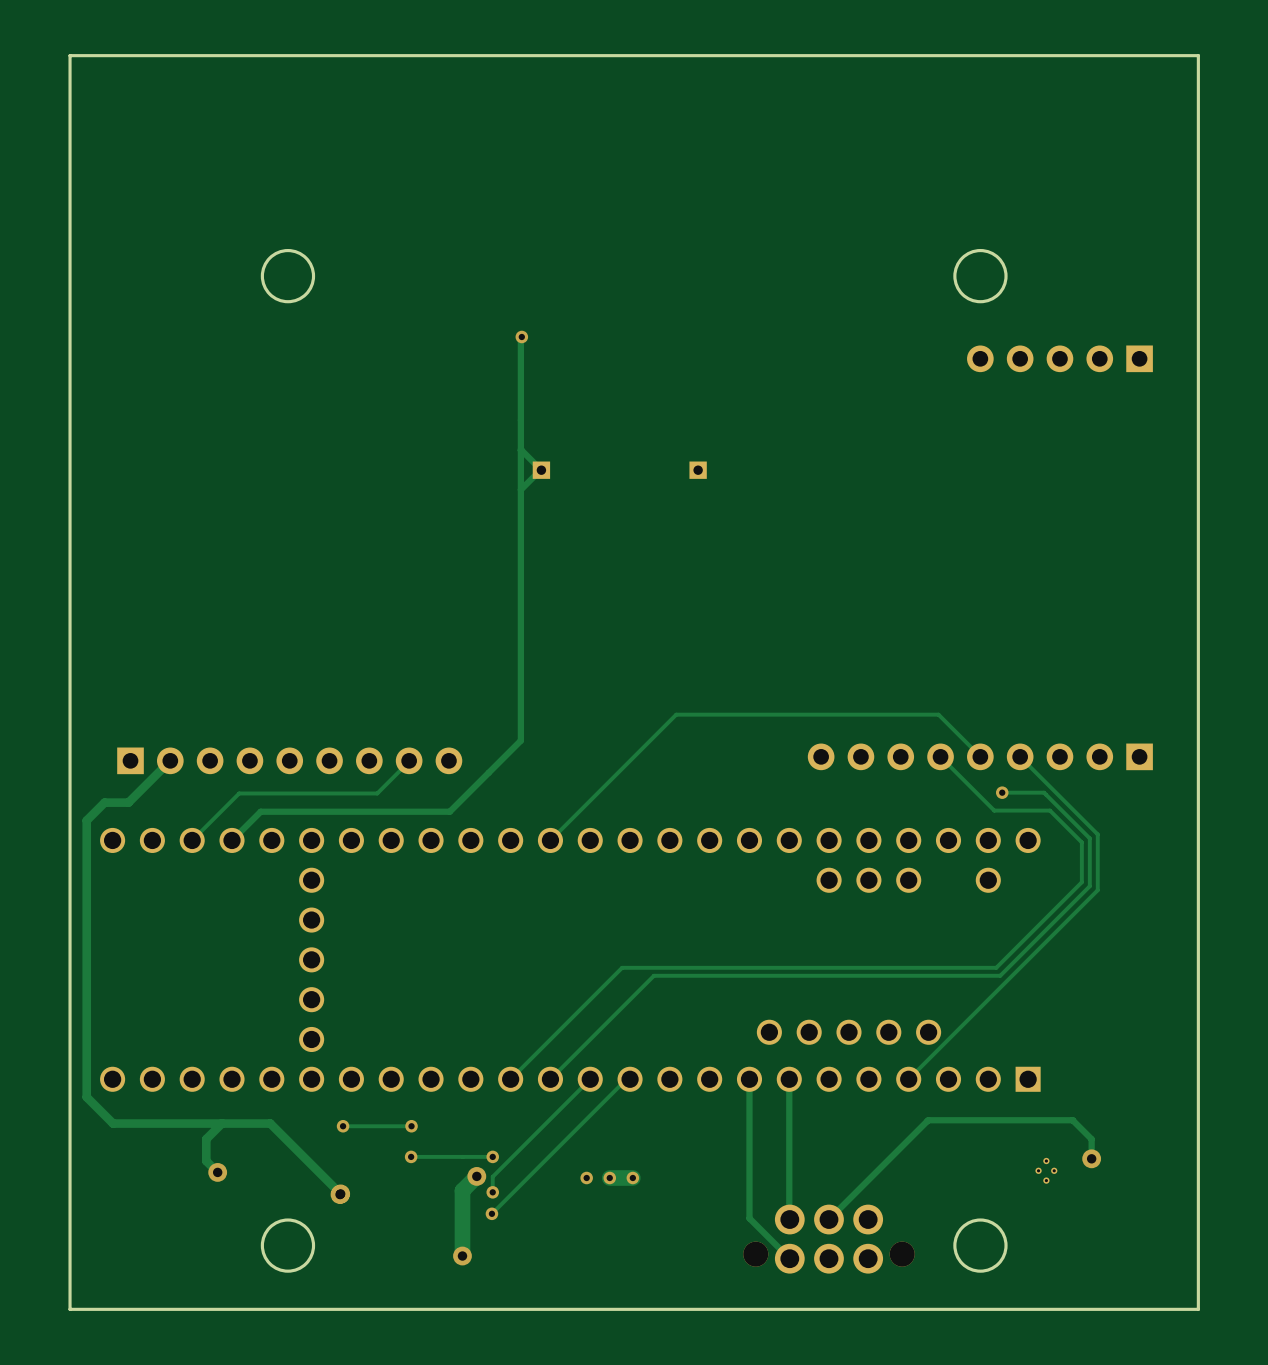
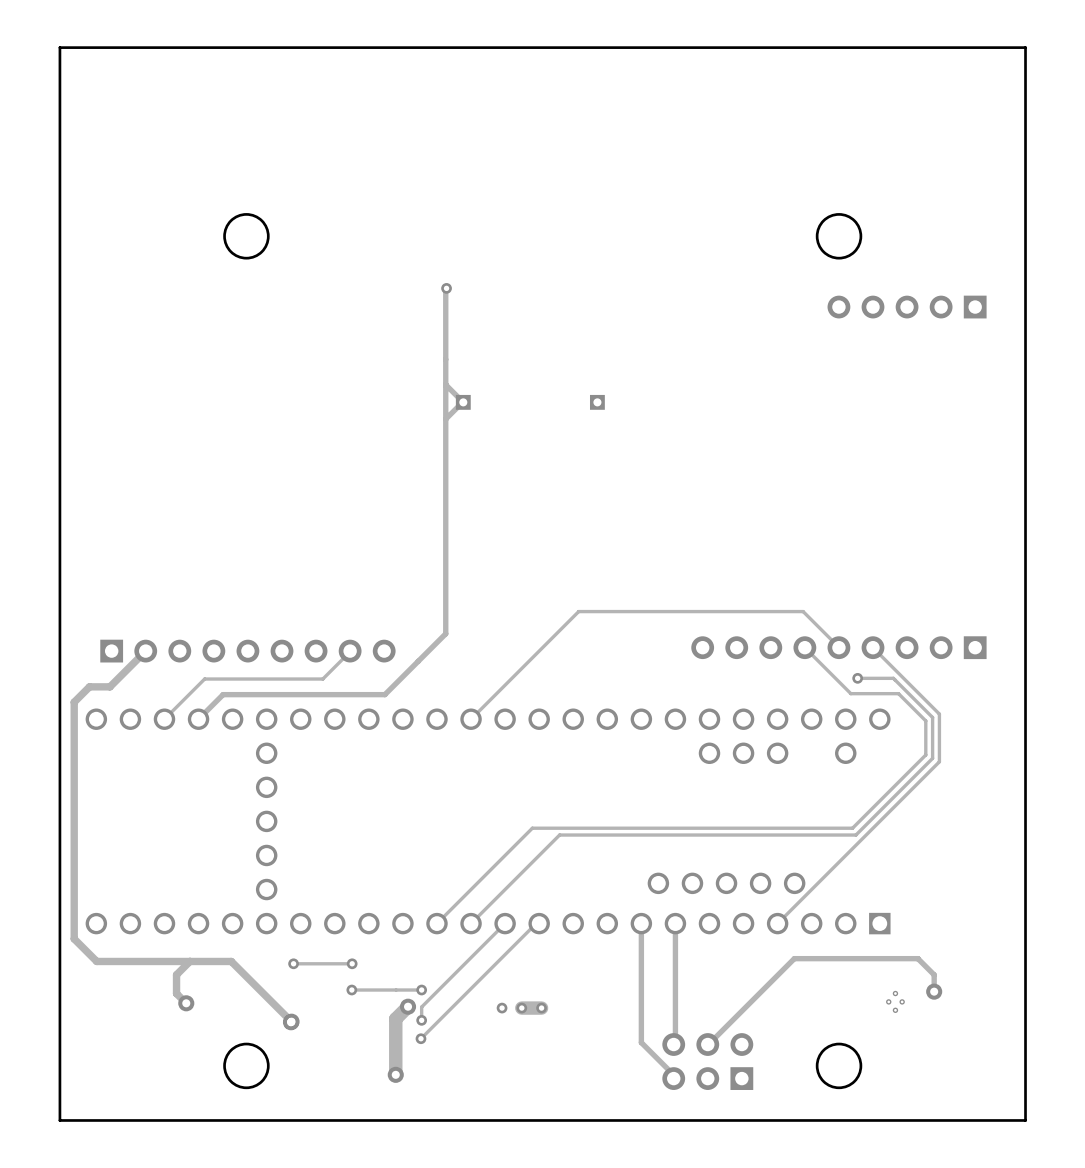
part footprint: [743, 1204, 915, 1274] -> [662, 1033, 754, 1090]

